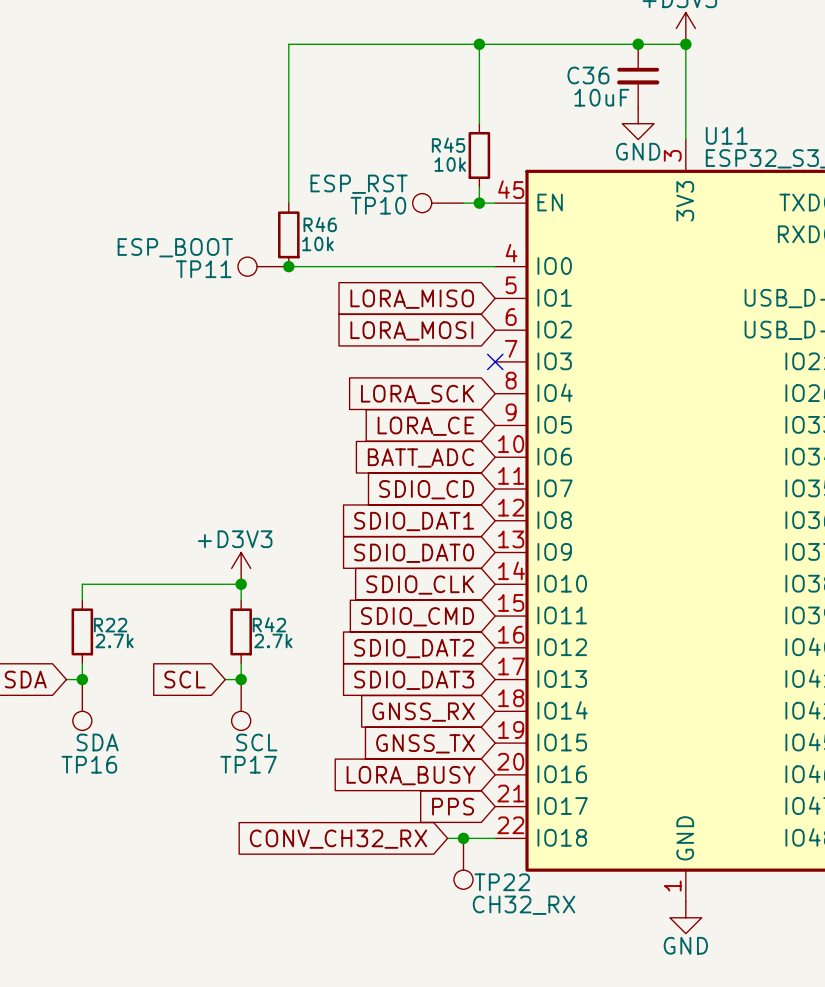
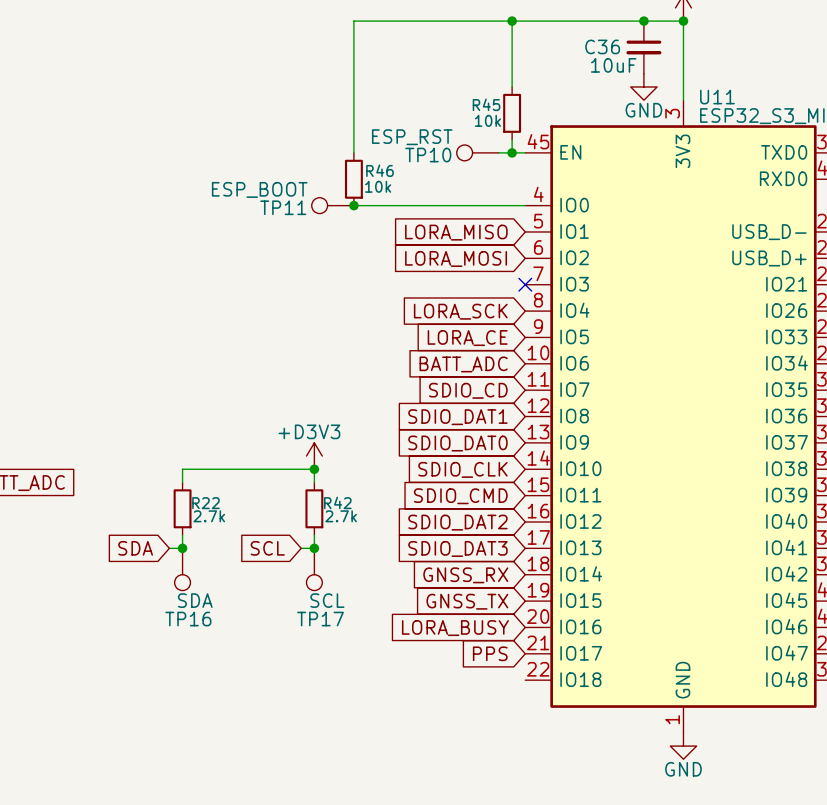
wire: (447, 838) (495, 838) -> none
junction: (463, 838) -> none
global label: CONV_CH32_RX (338, 839) -> none
TP22: CH32_RX (463, 863) -> none

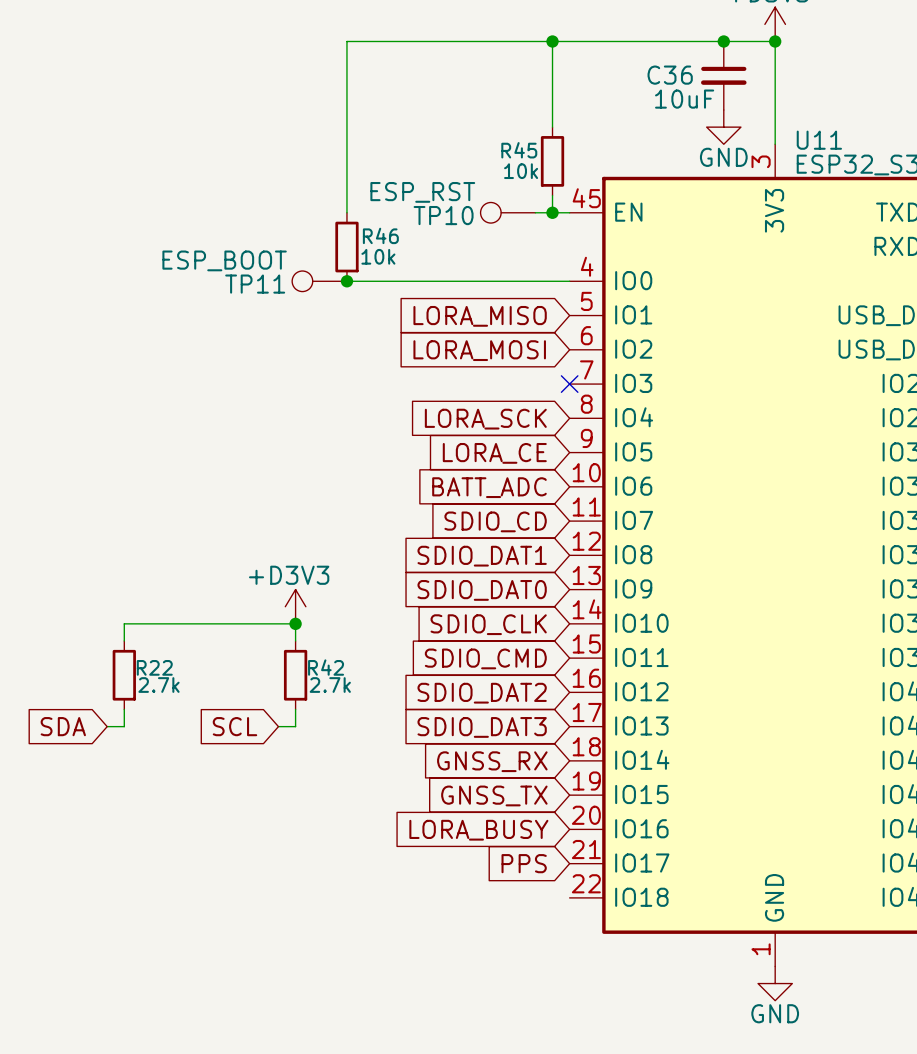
junction: (182, 548) -> none
junction: (314, 548) -> none
TP16: SDA (182, 569) -> none
TP17: SCL (314, 569) -> none

